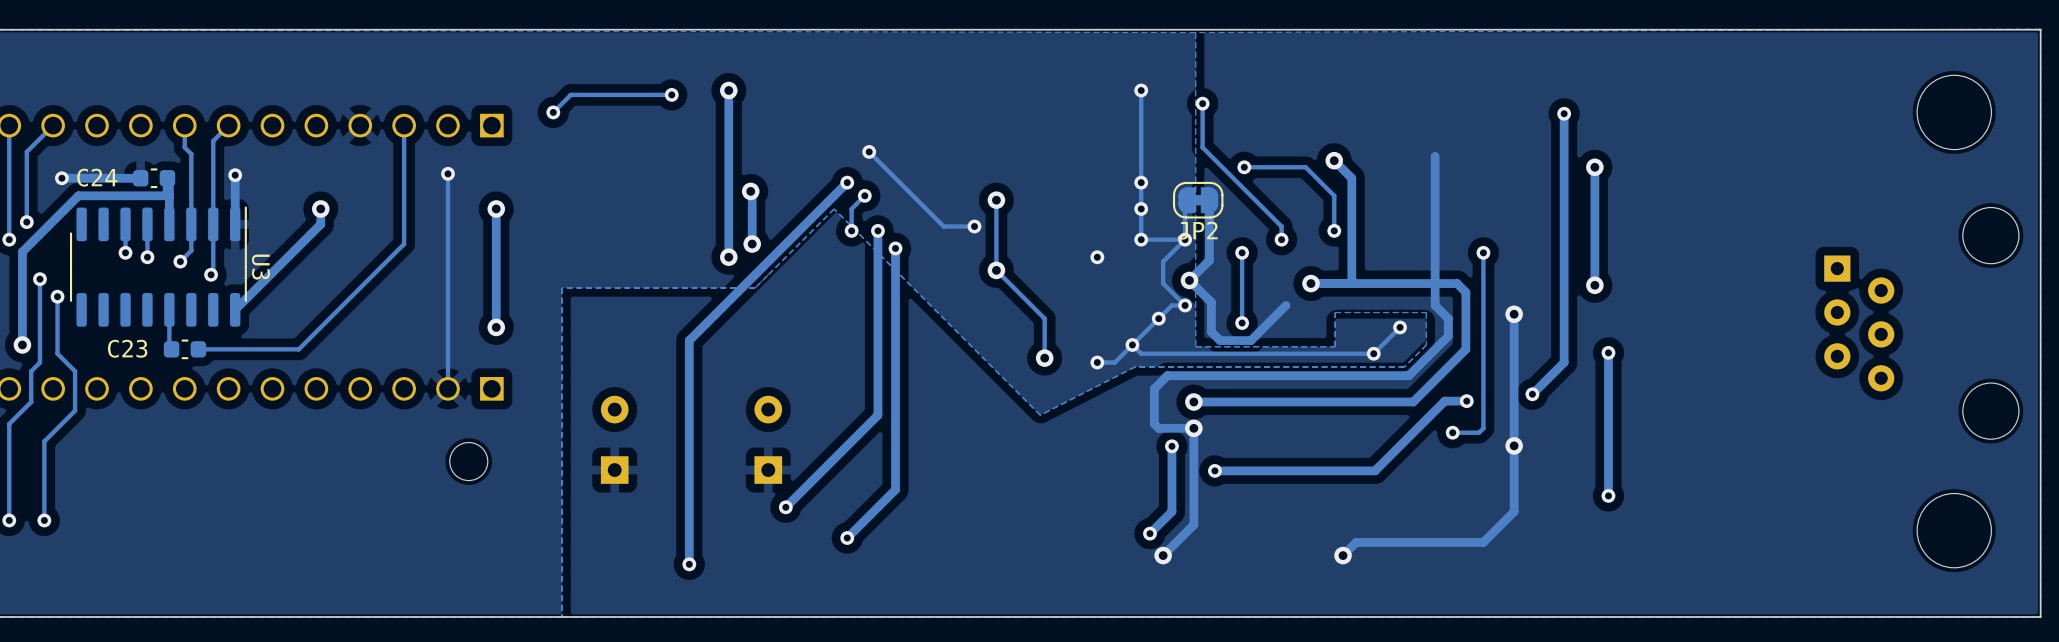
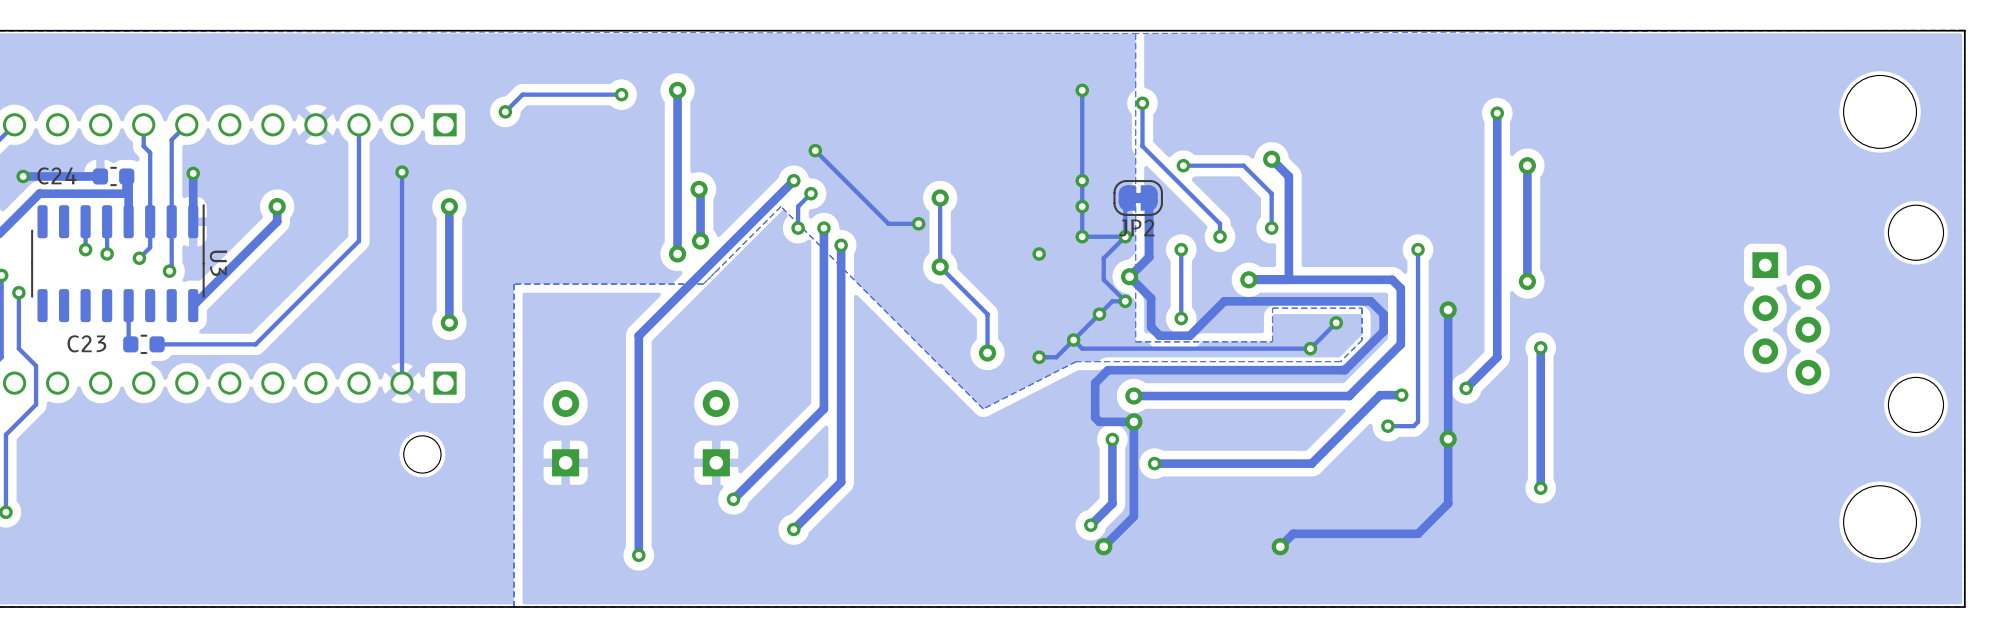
track: (1435, 156) (1435, 305) -> (1224, 301) (1370, 301)

